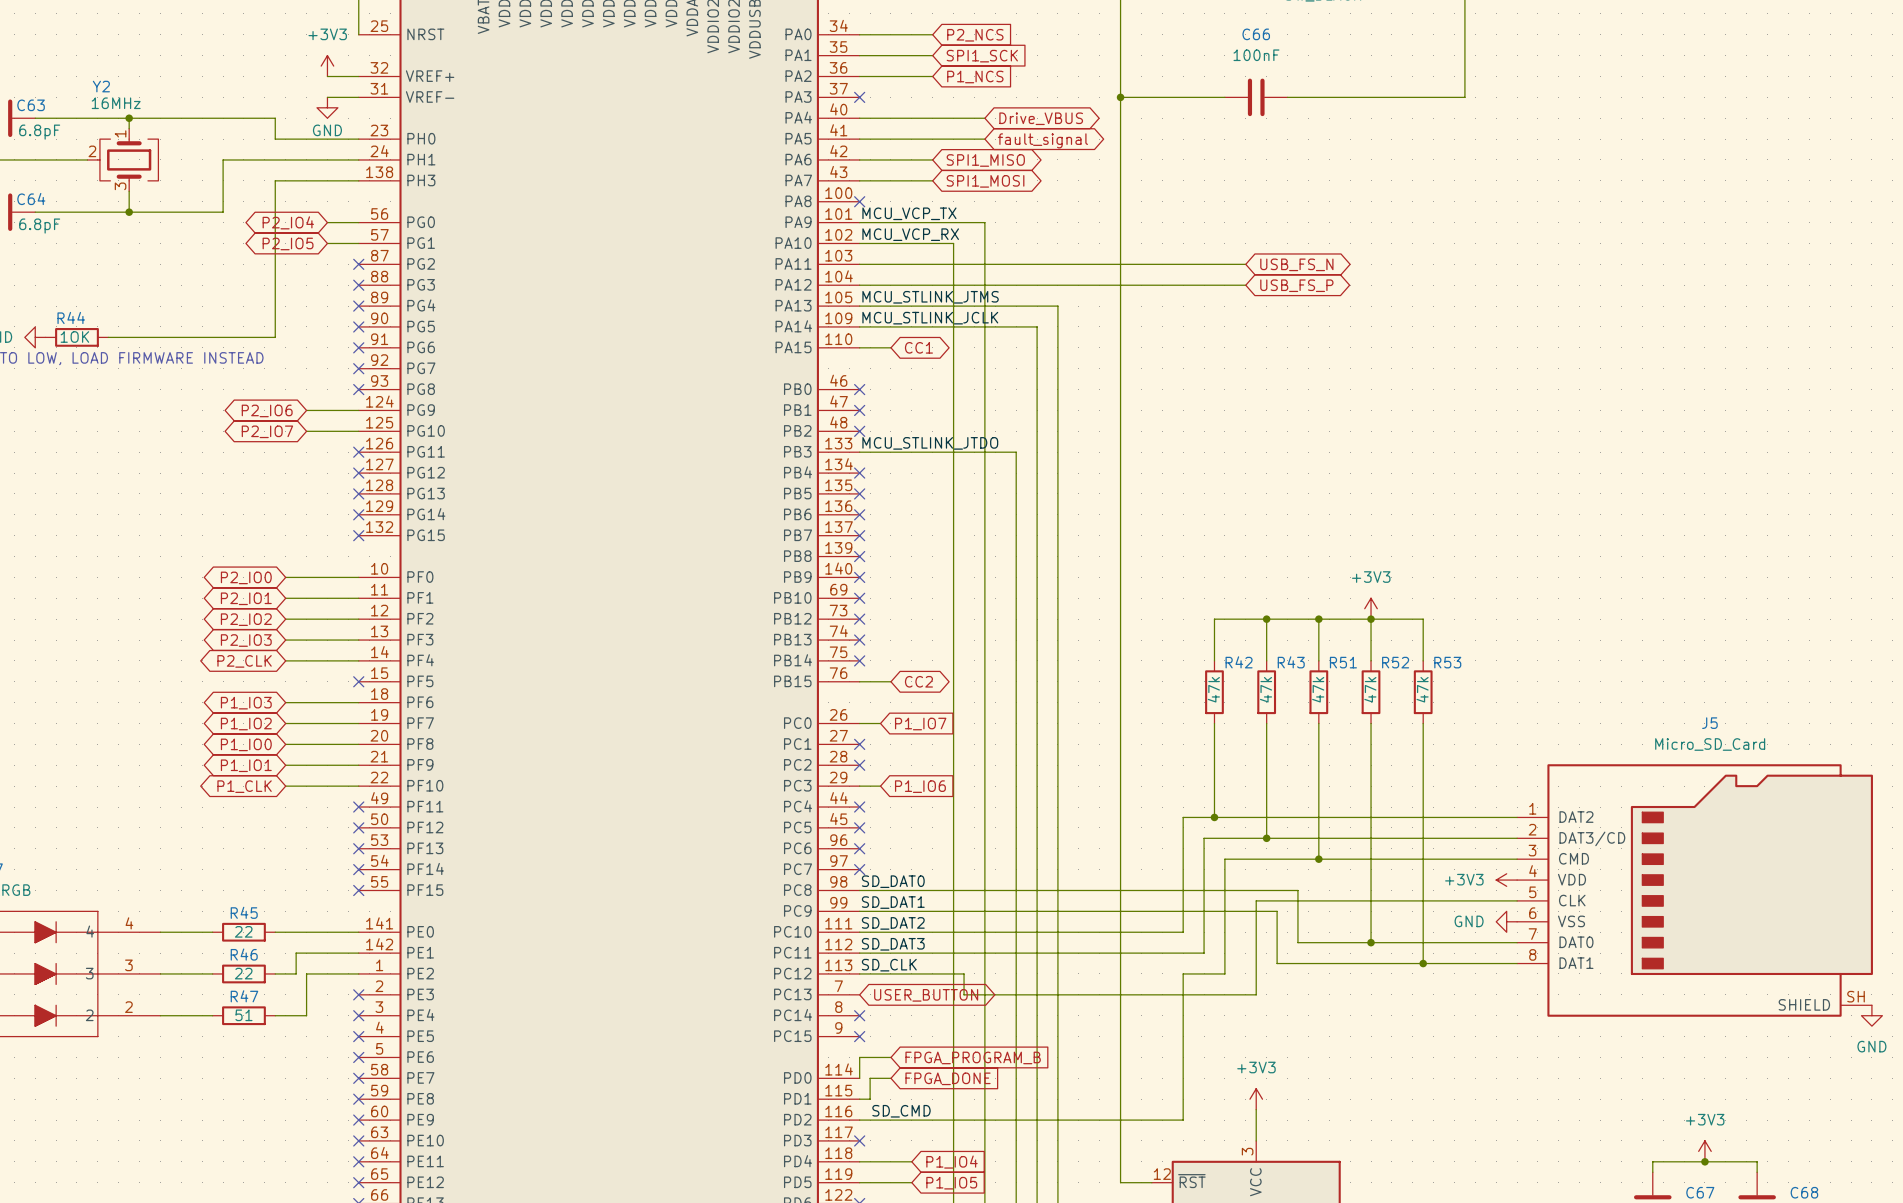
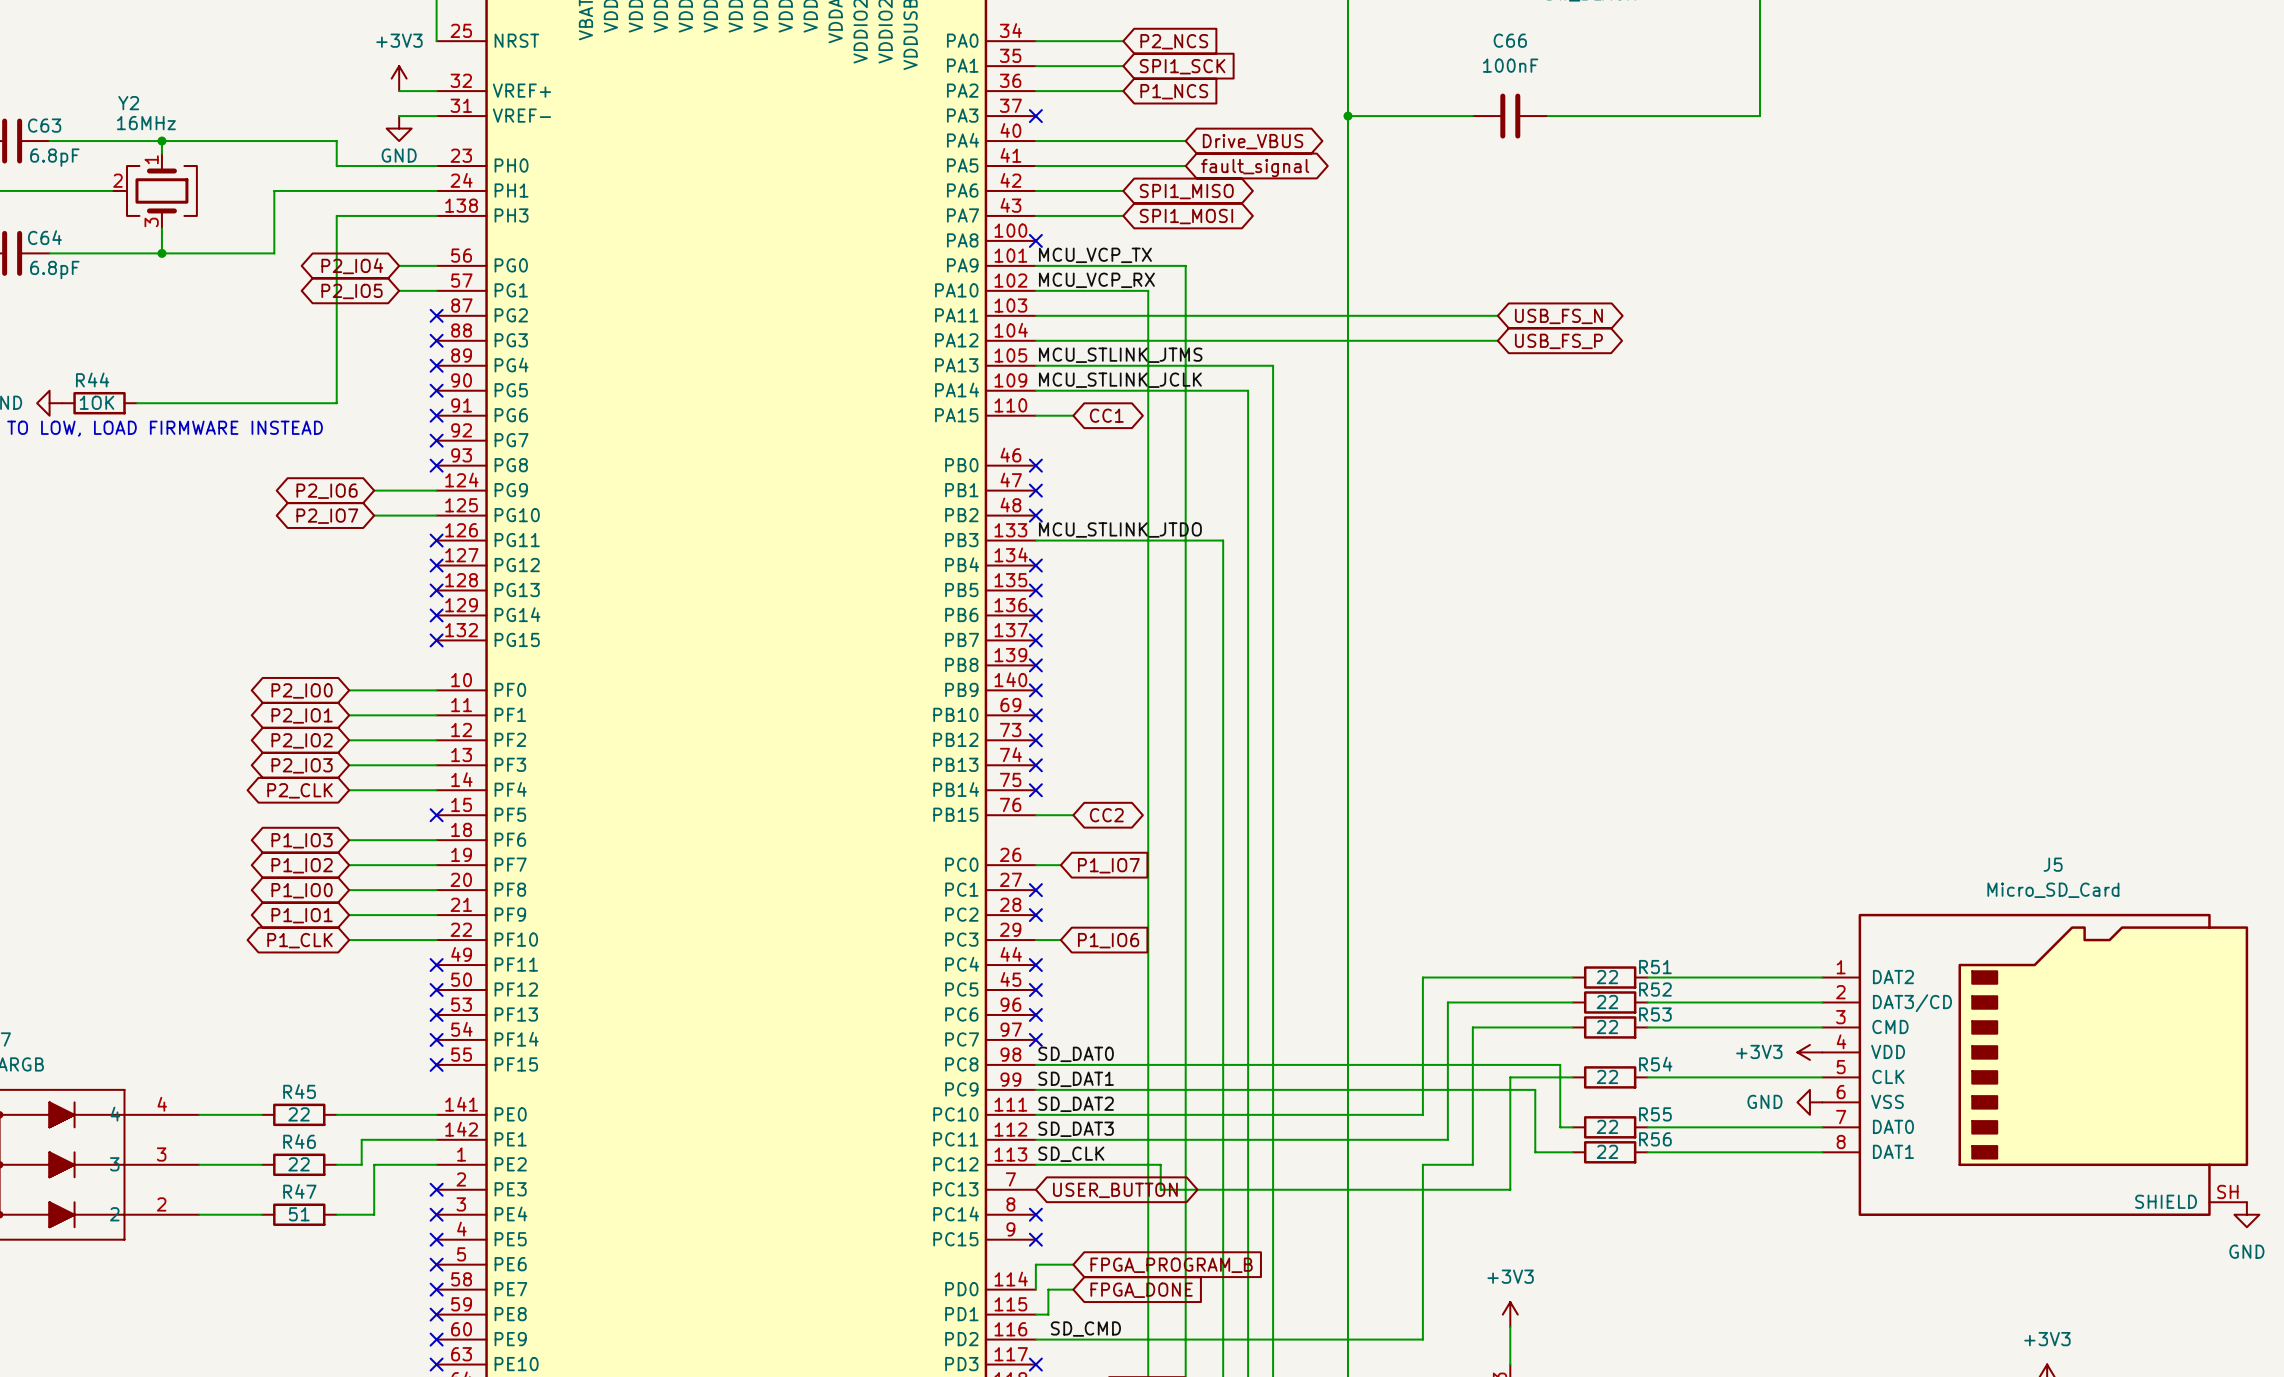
power symbol: +3V3 (1371, 608) -> none
wire: (1266, 619) (1266, 660) -> none
junction: (1266, 619) -> none
wire: (1318, 619) (1318, 660) -> none
junction: (1318, 619) -> none
wire: (1371, 619) (1371, 660) -> none
junction: (1371, 619) -> none
wire: (1214, 660) (1214, 619) (1423, 619) (1423, 660) -> none
R51 name position: R51 (1343, 662) -> R51 (1655, 967)
R52 name position: R52 (1395, 662) -> R52 (1655, 989)
R53 name position: R53 (1447, 662) -> R53 (1655, 1014)
R51 value: 47k (1318, 689) -> 22 (1607, 977)
R52 value: 47k (1370, 689) -> 22 (1607, 1002)
R53 value: 47k (1422, 689) -> 22 (1607, 1026)
R42: 47k (1214, 692) -> none
R43: 47k (1266, 692) -> none
R51 rotation: 0° (1318, 692) -> 90° clockwise (1610, 977)
R51 position: (1318, 692) -> (1610, 977)
R52 rotation: 0° (1371, 692) -> 90° clockwise (1610, 1002)
R52 position: (1371, 692) -> (1610, 1002)
R53 rotation: 0° (1423, 692) -> 90° clockwise (1610, 1027)
R53 position: (1423, 692) -> (1610, 1027)
wire: (1214, 723) (1214, 817) -> none
wire: (1266, 723) (1266, 838) -> none
wire: (1318, 723) (1318, 859) -> none
wire: (1371, 723) (1371, 942) (1308, 942) -> none
wire: (1423, 723) (1423, 963) -> none
junction: (1214, 817) -> none
wire: (1308, 817) (1371, 817) -> none
junction: (1266, 838) -> none
wire: (1308, 838) (1371, 838) -> none
wire: (1308, 859) (1371, 859) -> none
junction: (1318, 859) -> none
wire: (1308, 900) (1371, 900) -> none
R54: none -> 22 (1610, 1077)
R55: none -> 22 (1610, 1127)
junction: (1371, 942) -> none
wire: (1308, 963) (1371, 963) -> none
R56: none -> 22 (1610, 1152)
junction: (1423, 963) -> none

